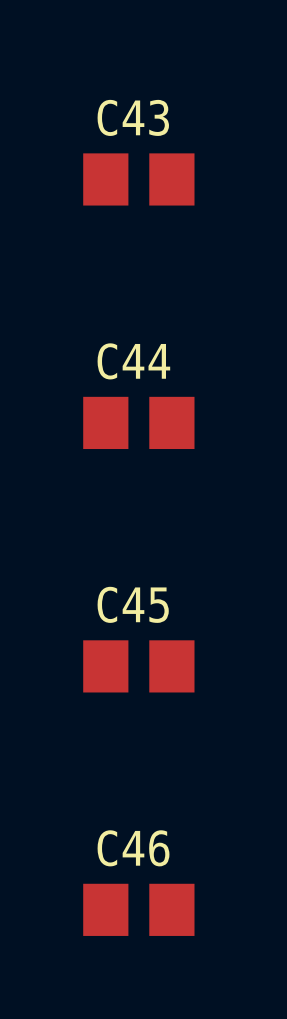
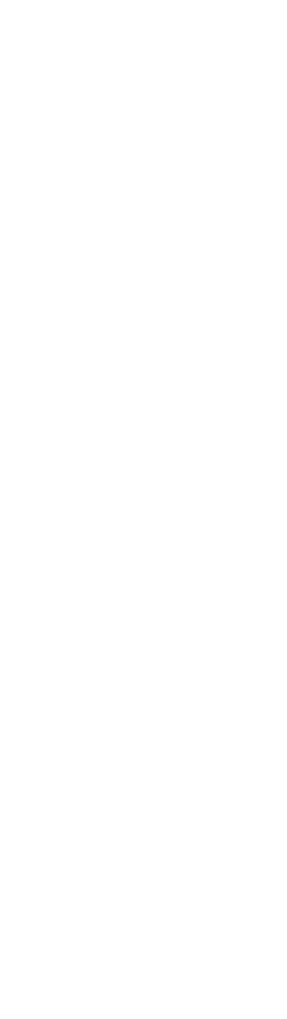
C43: (138, 179) -> none
C44: (138, 422) -> none
C45: (138, 666) -> none
C46: (138, 909) -> none

